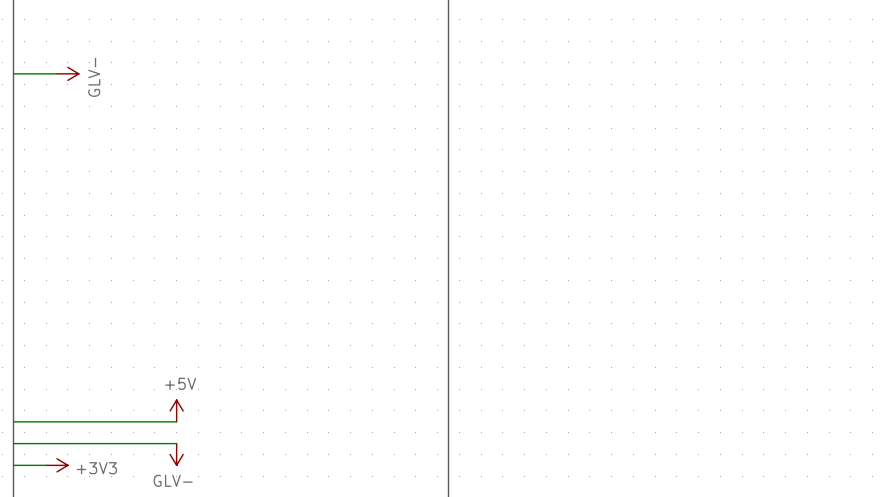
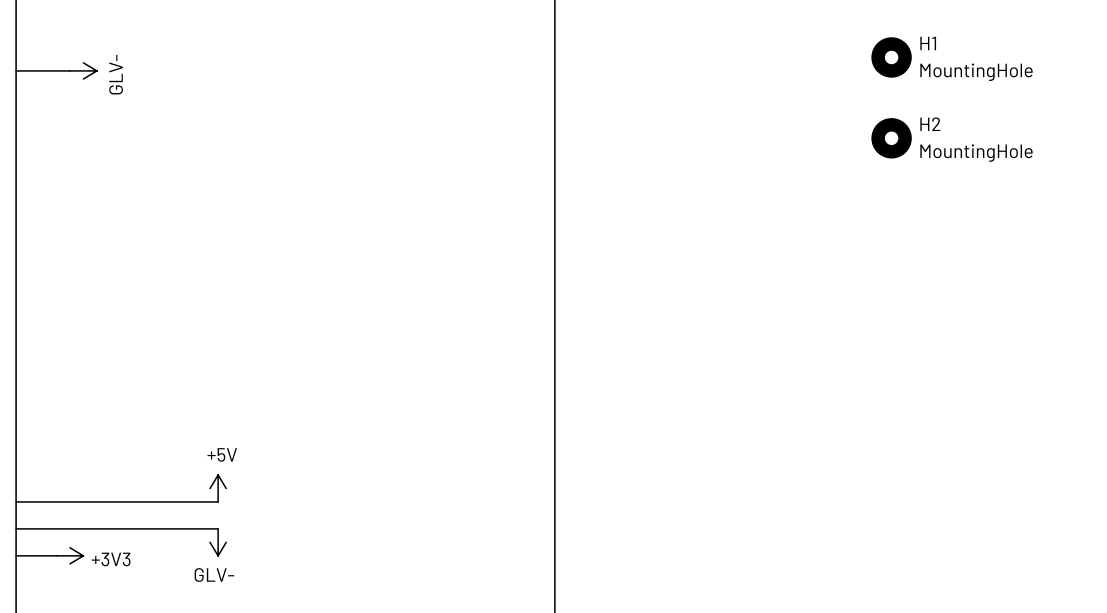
H1: none -> MountingHole (891, 57)
H2: none -> MountingHole (891, 138)

